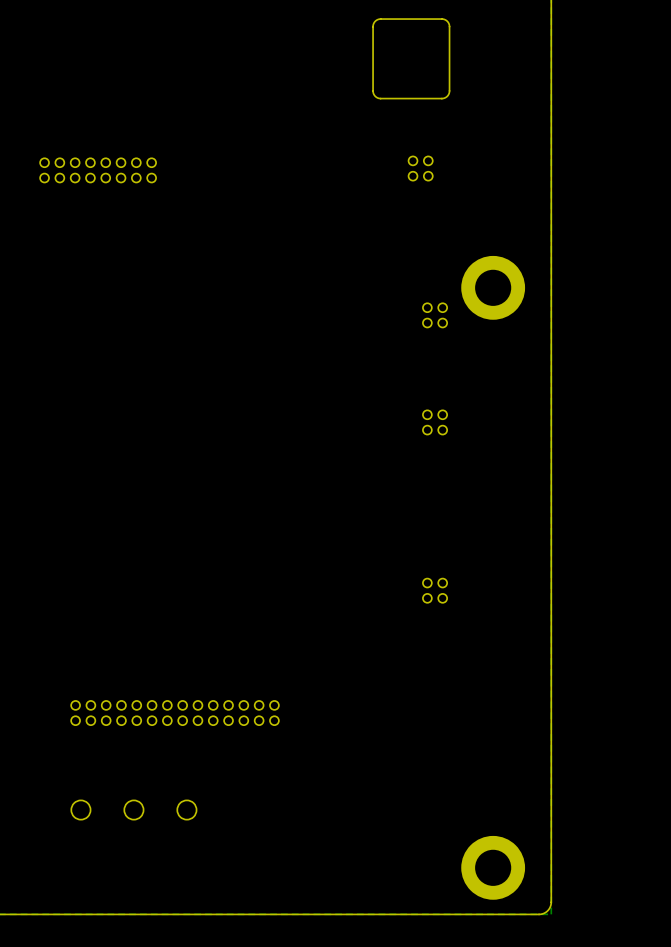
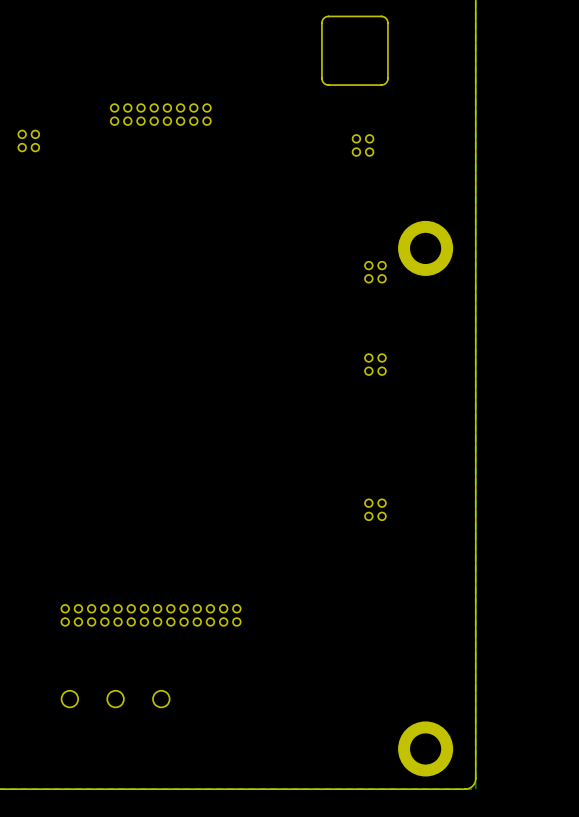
part: none -> (28, 140)
part position: (98, 170) -> (160, 114)

